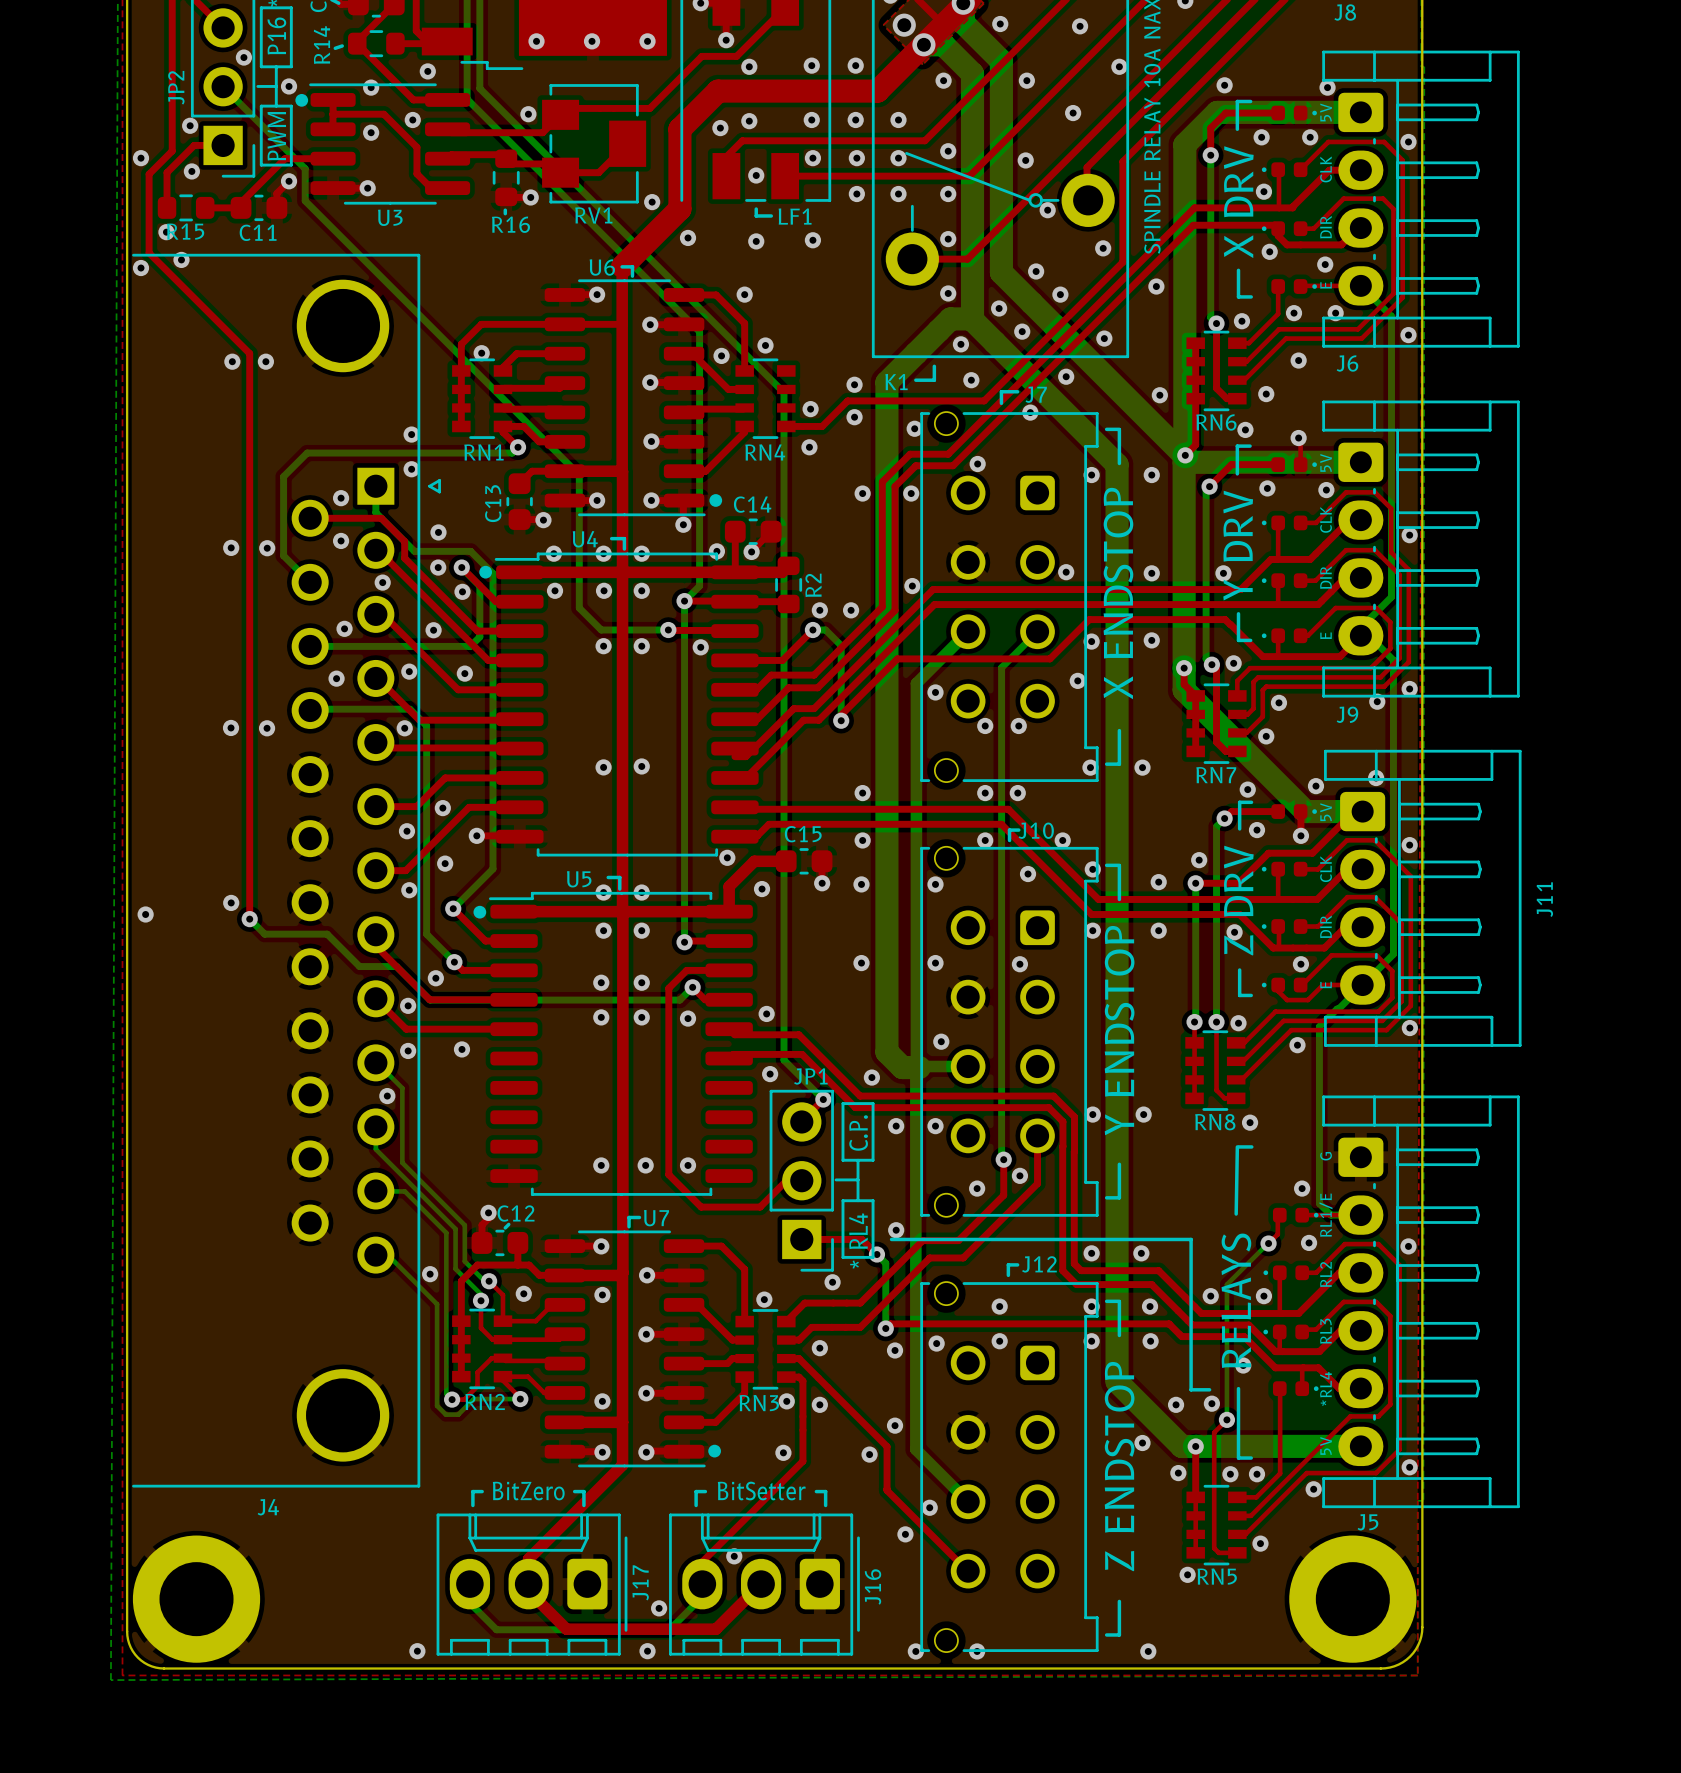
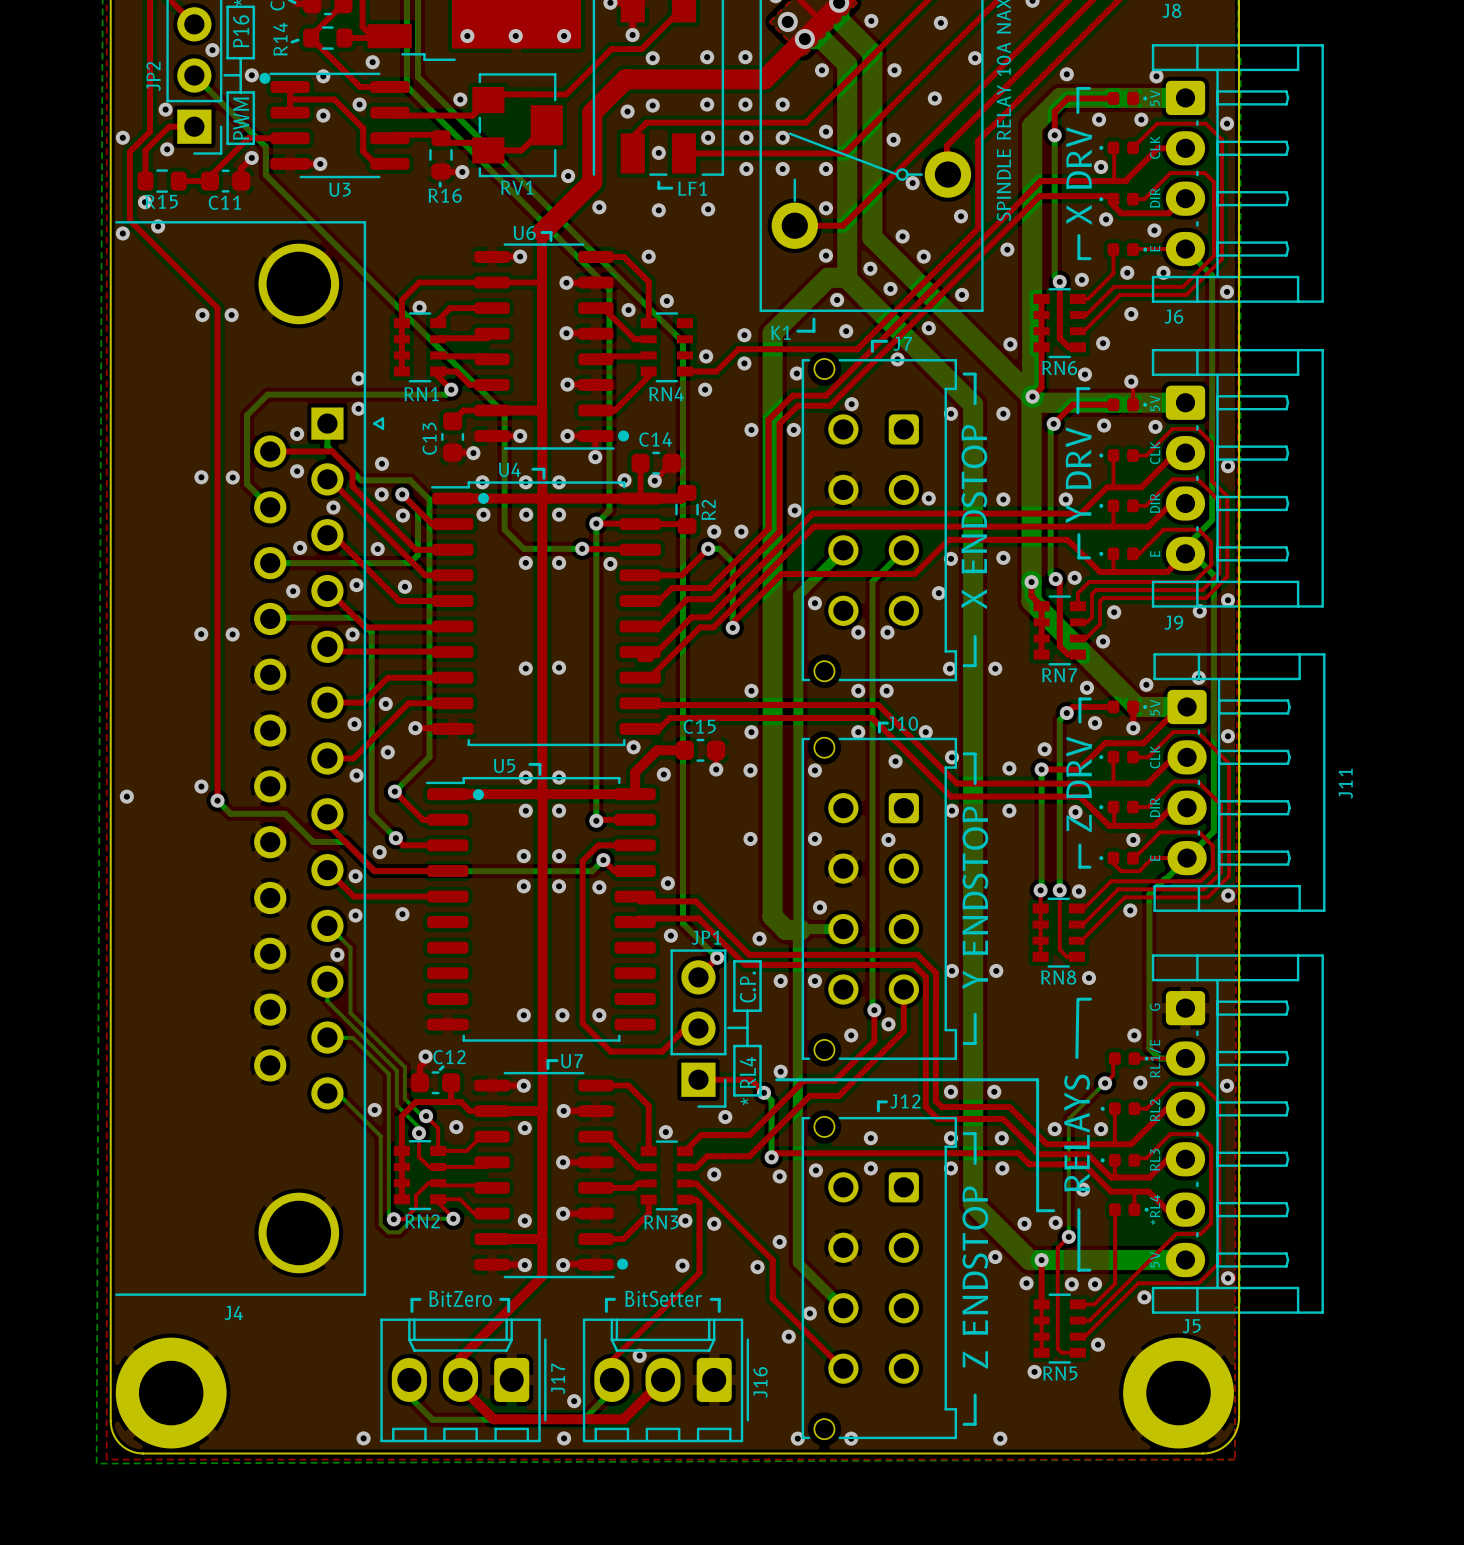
drawing shape: [295, 93, 309, 107] -> [259, 72, 271, 84]
drawing position: (485, 572) -> (483, 498)
drawing position: (479, 912) -> (478, 794)

